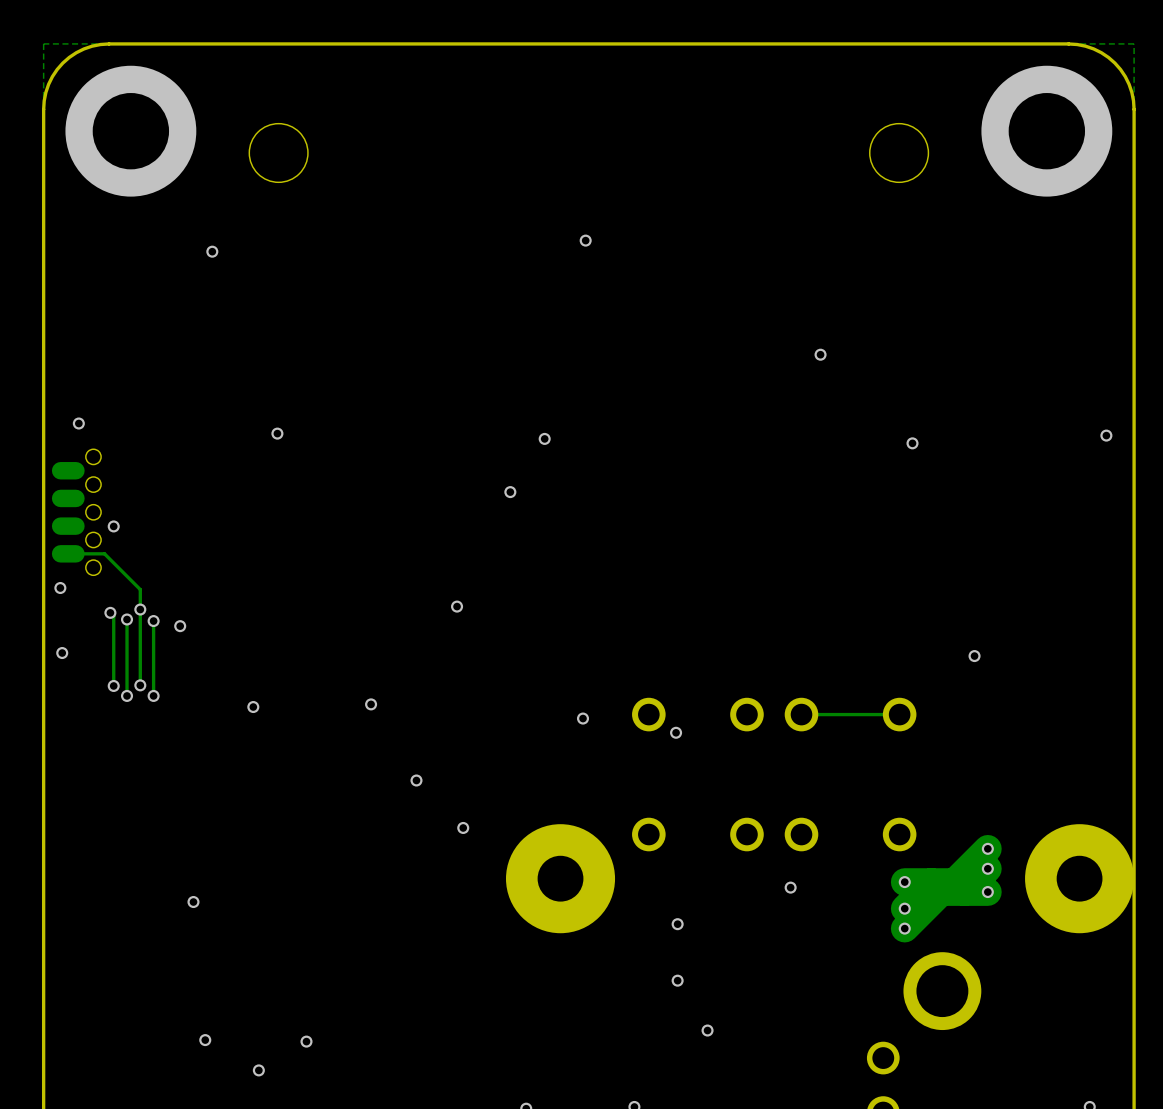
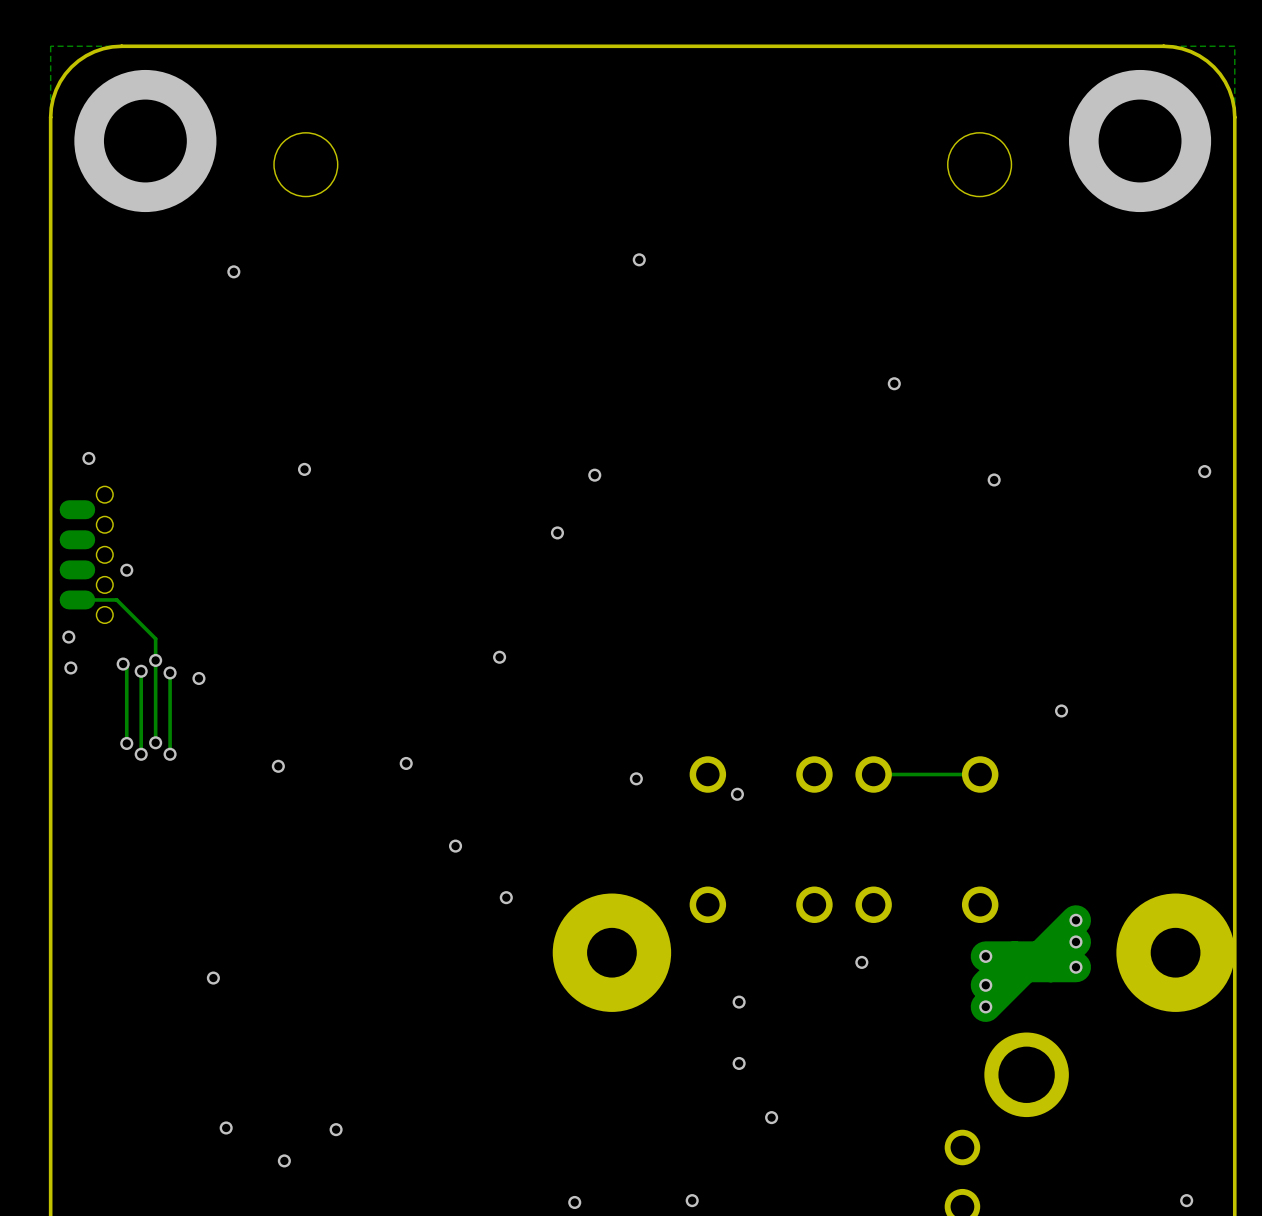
via position: (62, 653) -> (70, 667)

